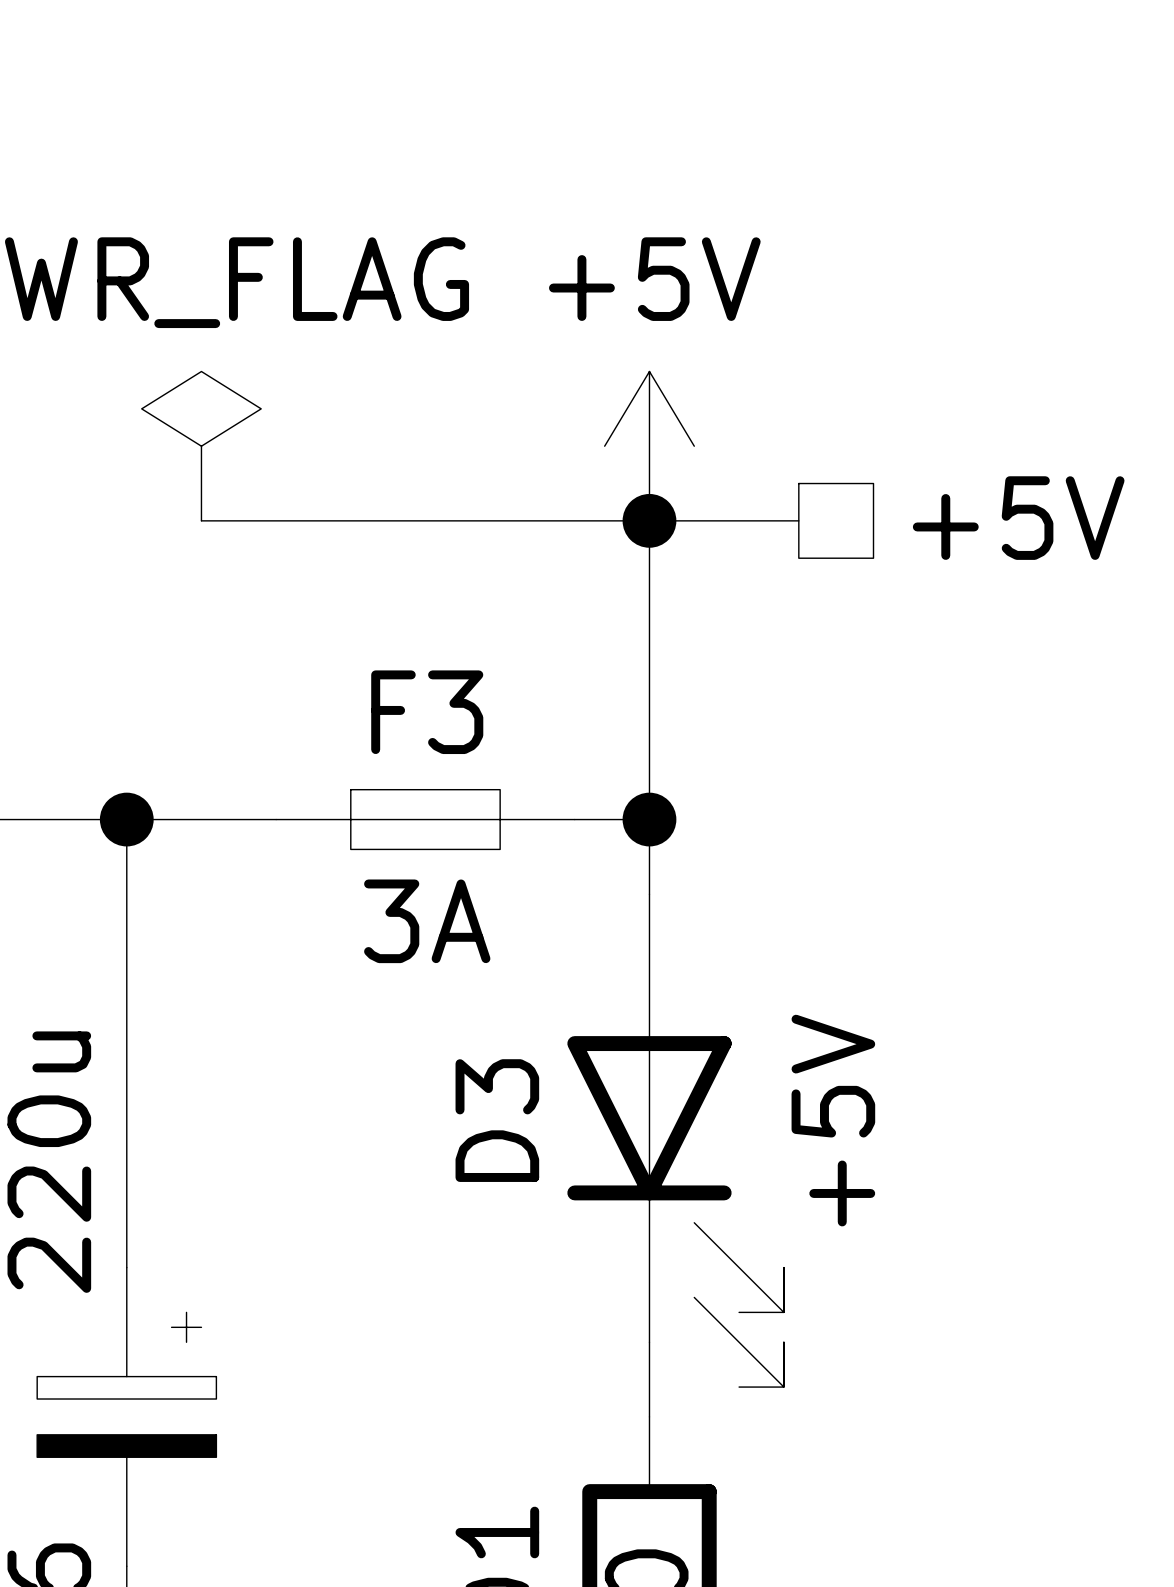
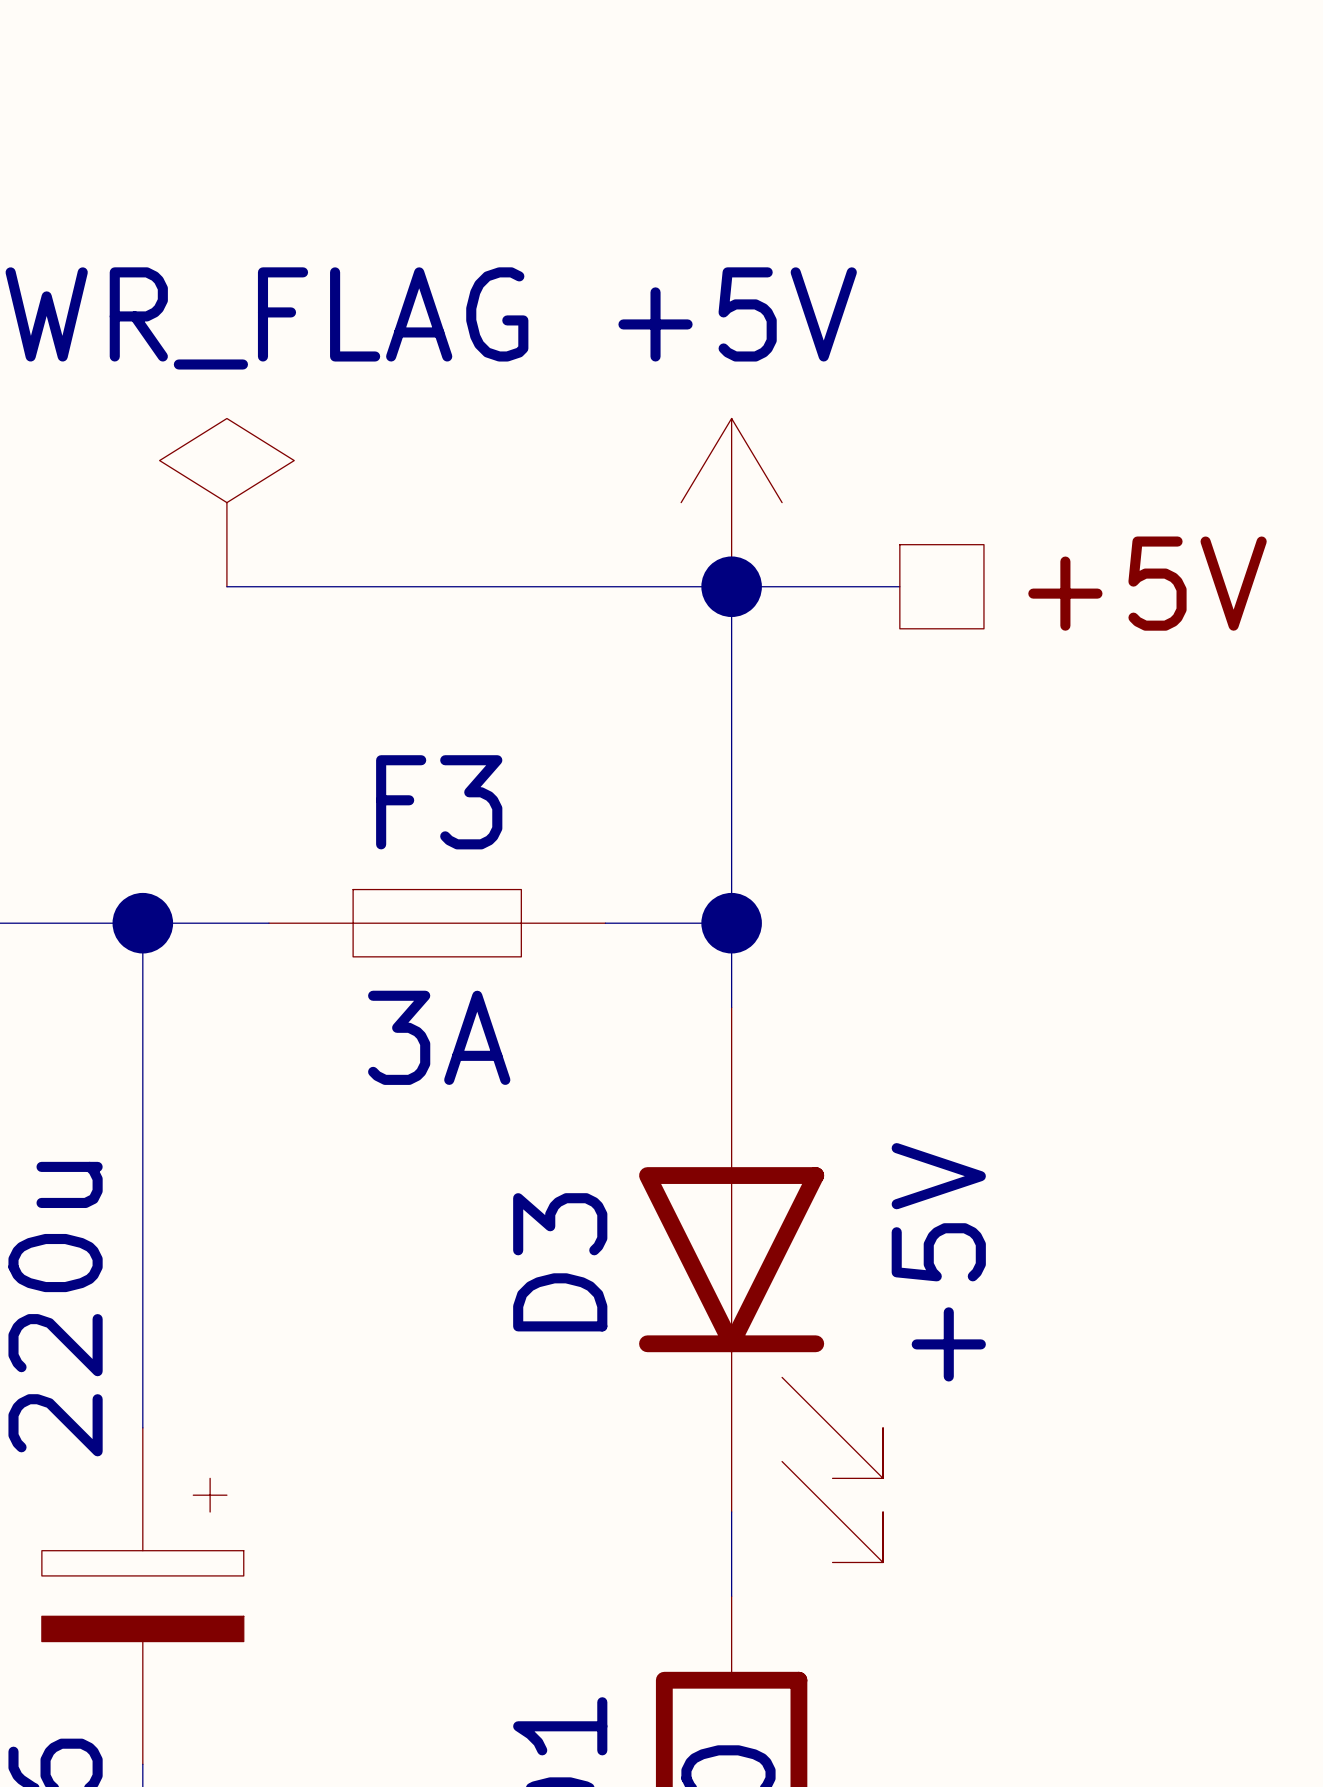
F3 position: (425, 819) -> (437, 923)

